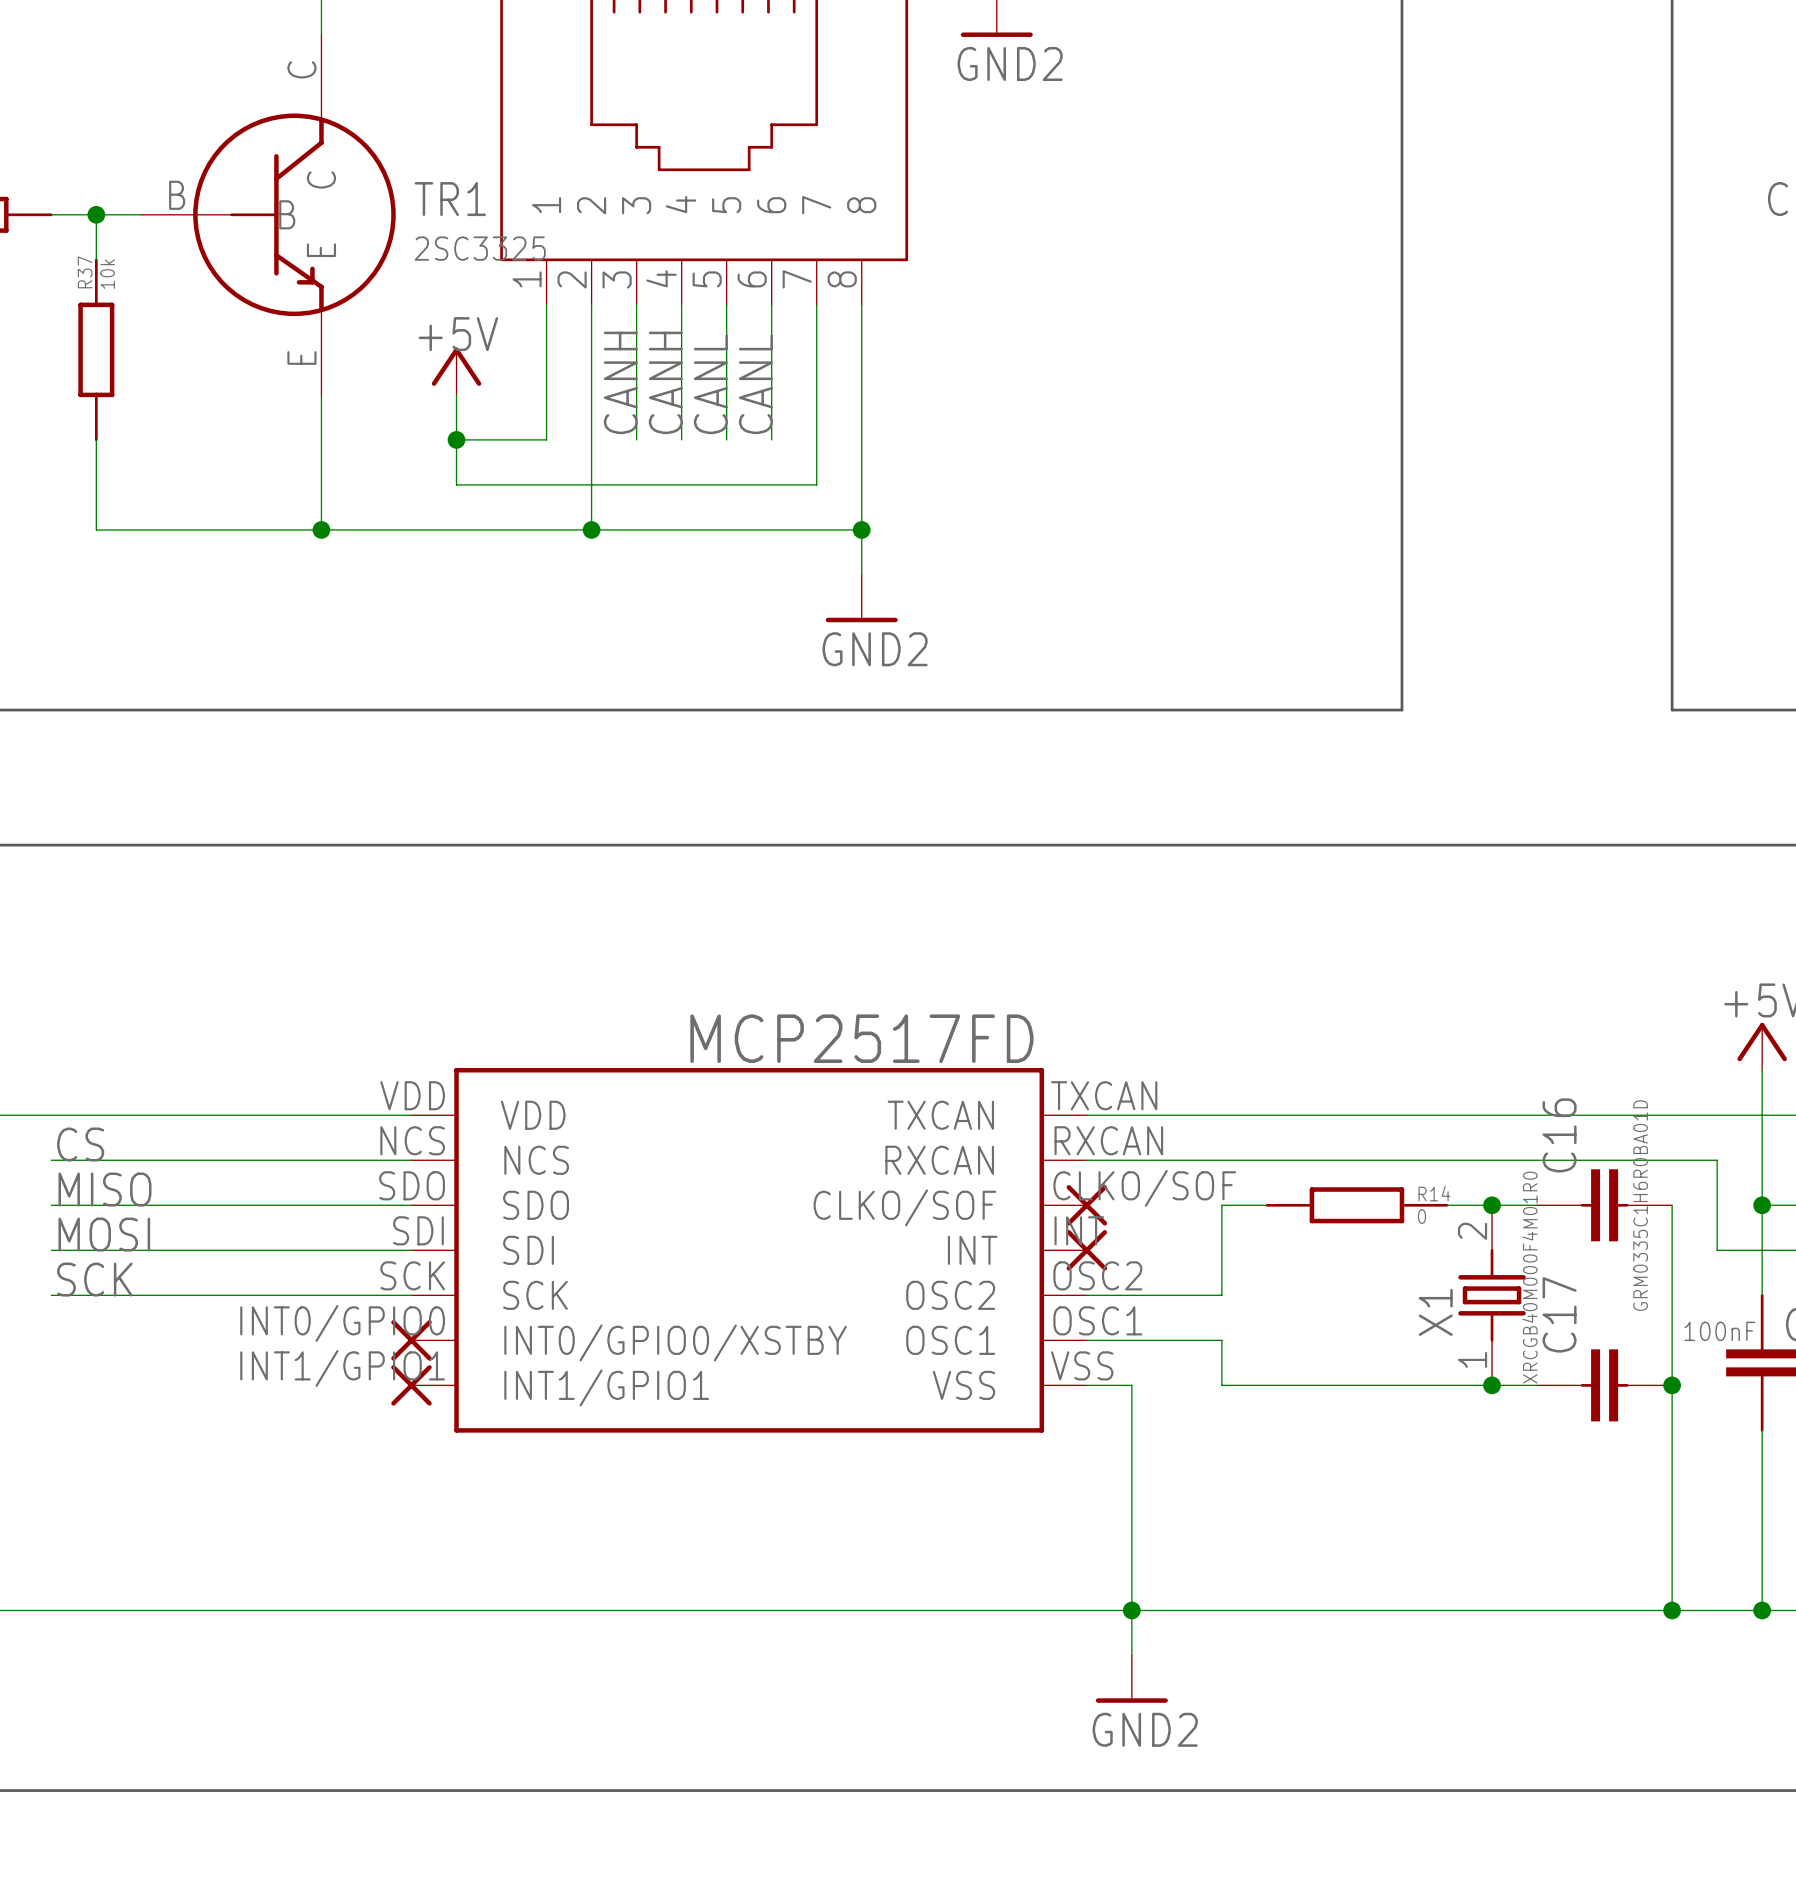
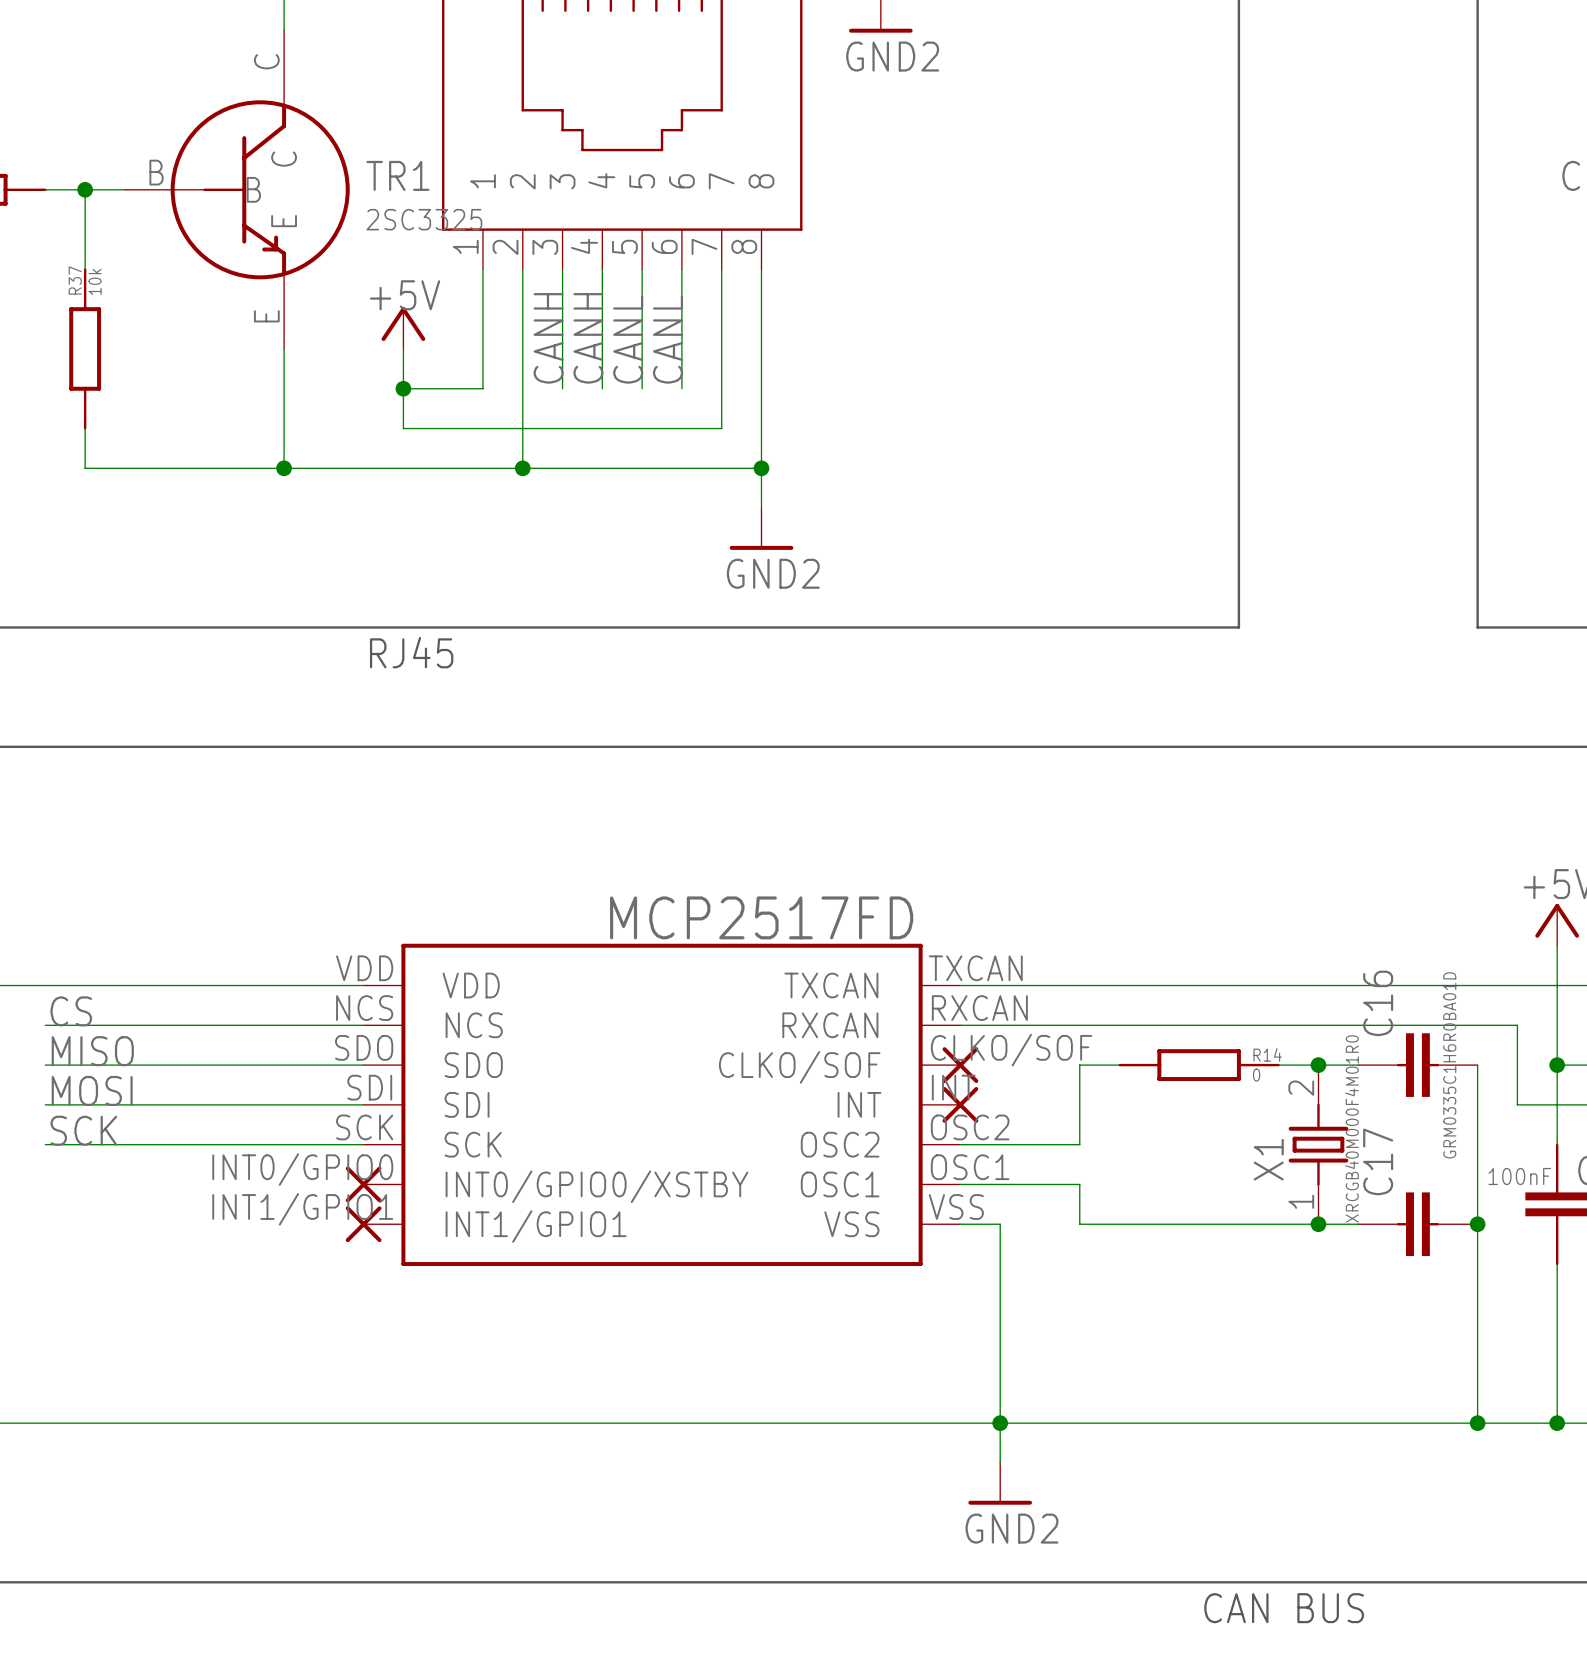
R37 position: (96, 349) -> (85, 348)
text: none -> RJ45 (411, 652)
text: none -> CAN BUS (1284, 1608)

